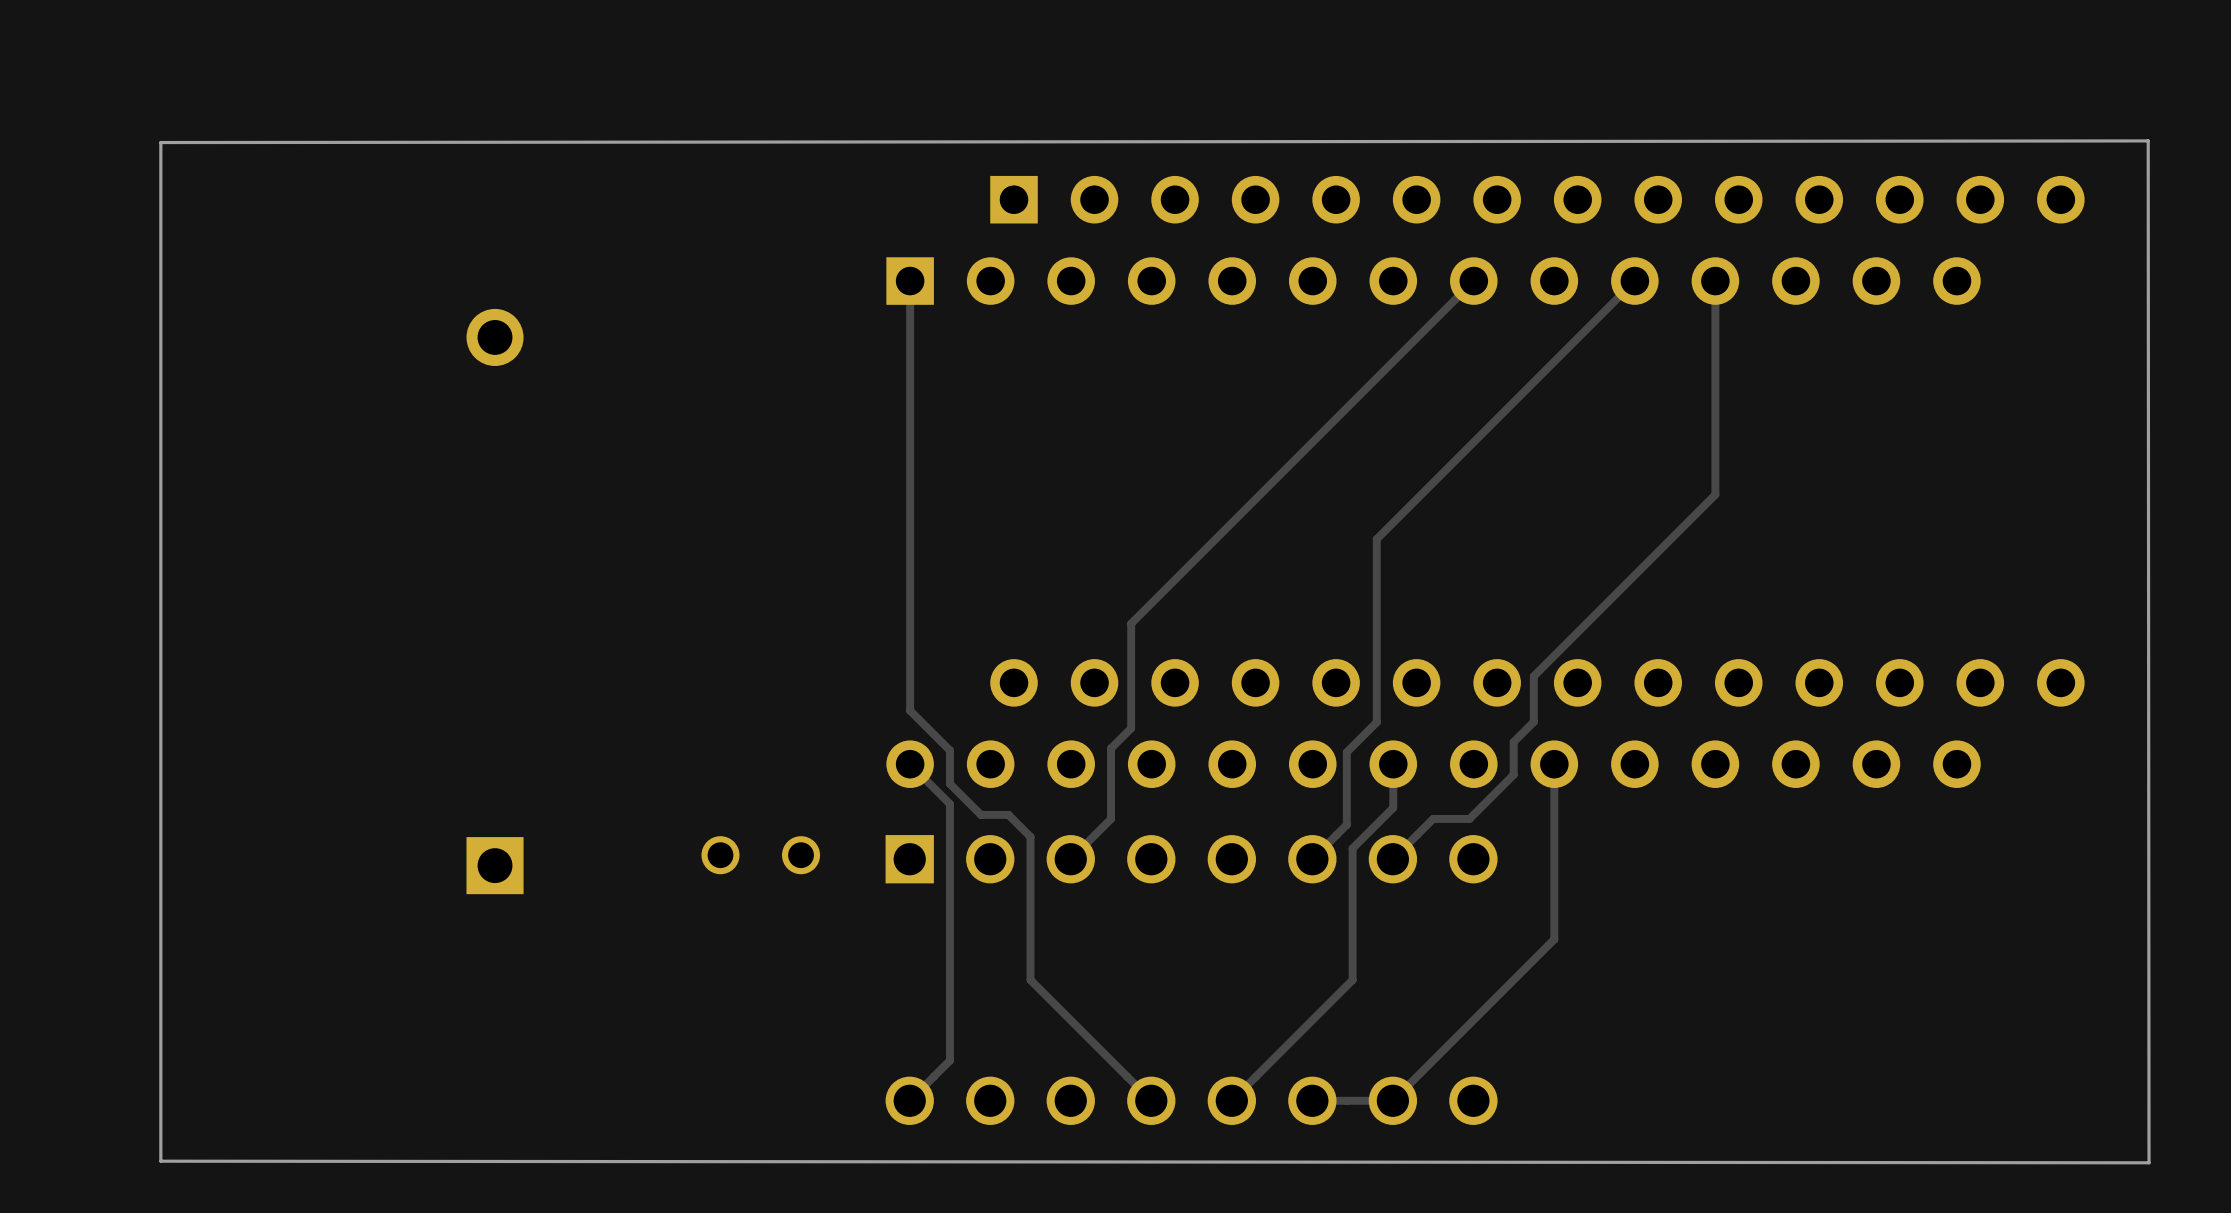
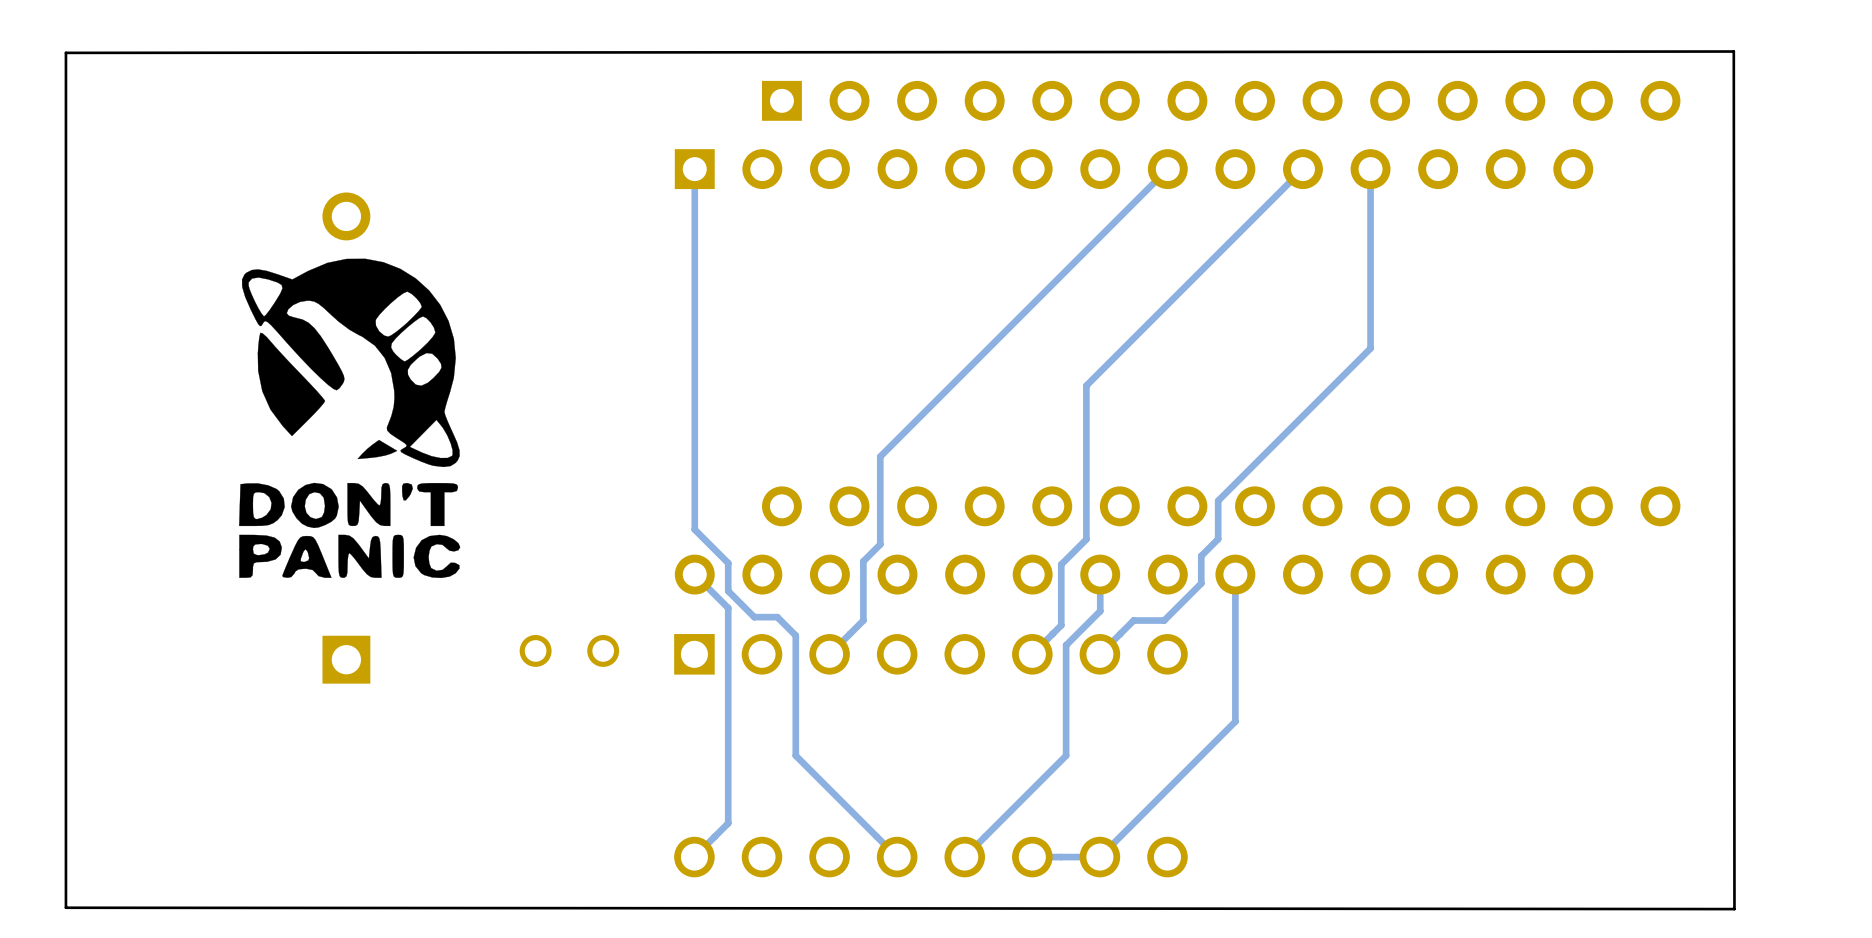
drawing: none -> [239, 258, 461, 579]

